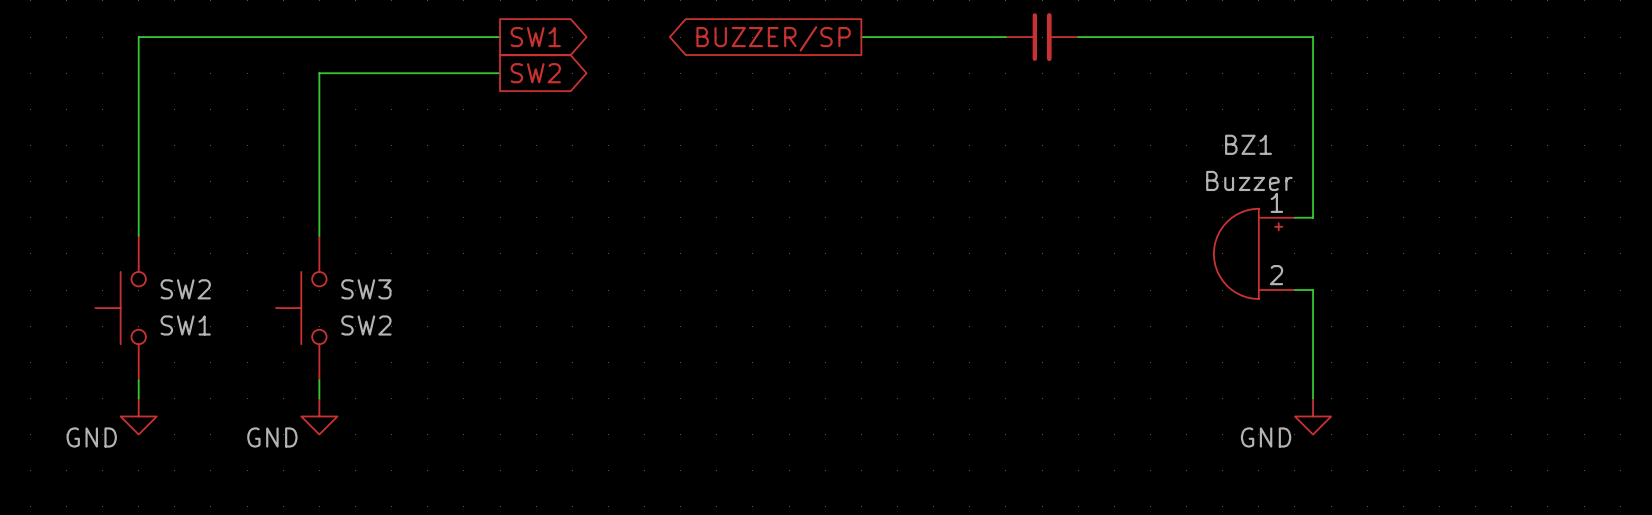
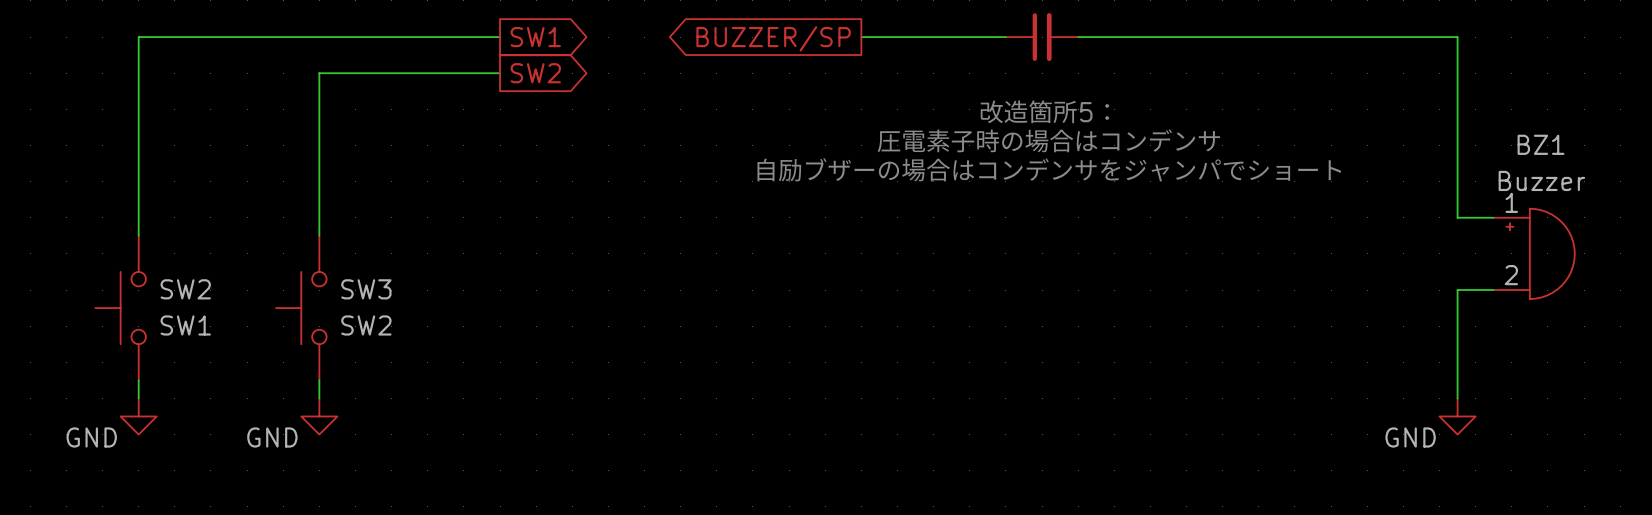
wire: (1313, 37) (1313, 217) (1294, 217) -> (1313, 37) (1457, 37) (1457, 217) (1493, 217)
text: none -> 改造箇所5： (1044, 111)
text: none -> 圧電素子時の場合はコンデンサ (1048, 140)
text: none -> 自励ブザーの場合はコンデンサをジャンパでショート (1049, 169)
BZ1 flip: as is (1248, 253) -> left-right (1540, 253)
BZ1 position: (1254, 253) -> (1534, 253)
wire: (1294, 290) (1313, 290) (1313, 398) -> none
wire: none -> (1493, 290) (1457, 290) (1457, 398)
power symbol position: GND (1313, 416) -> GND (1457, 416)

